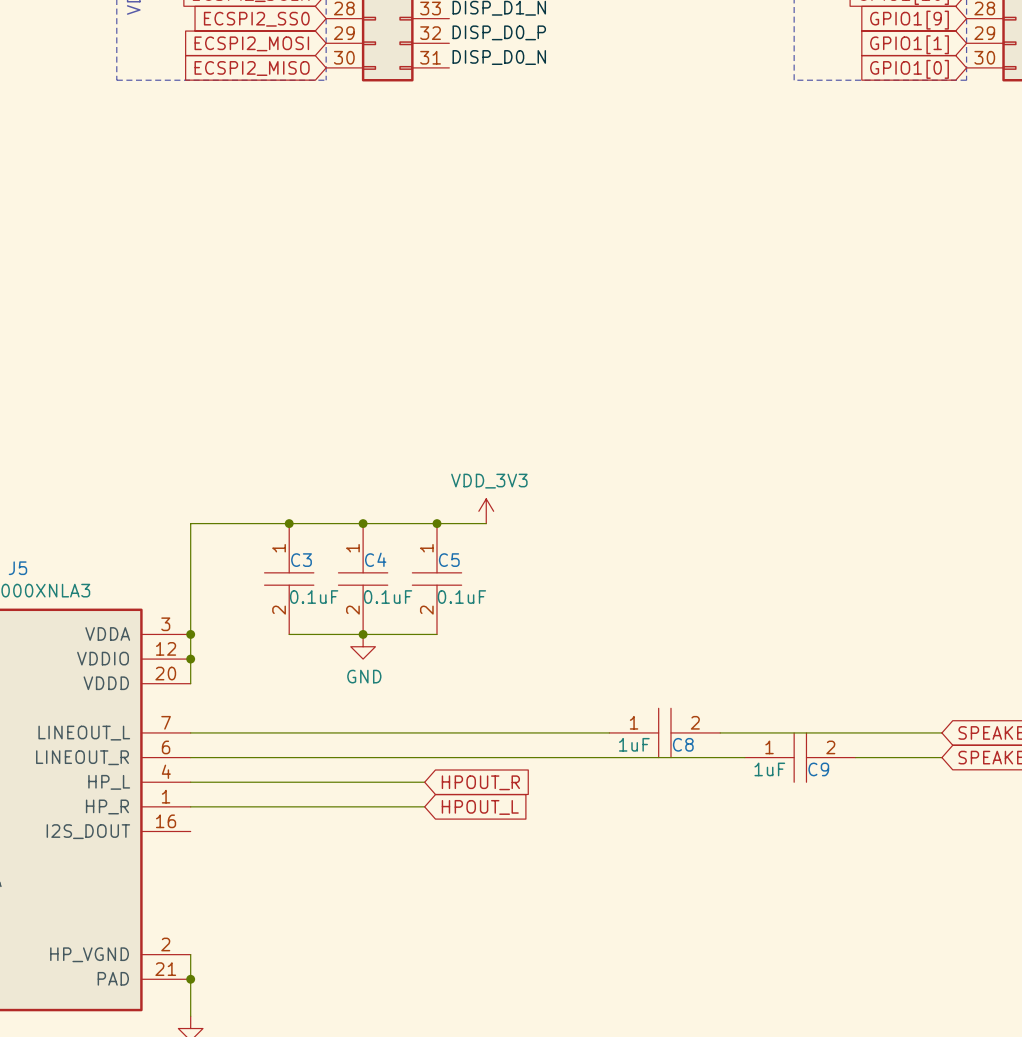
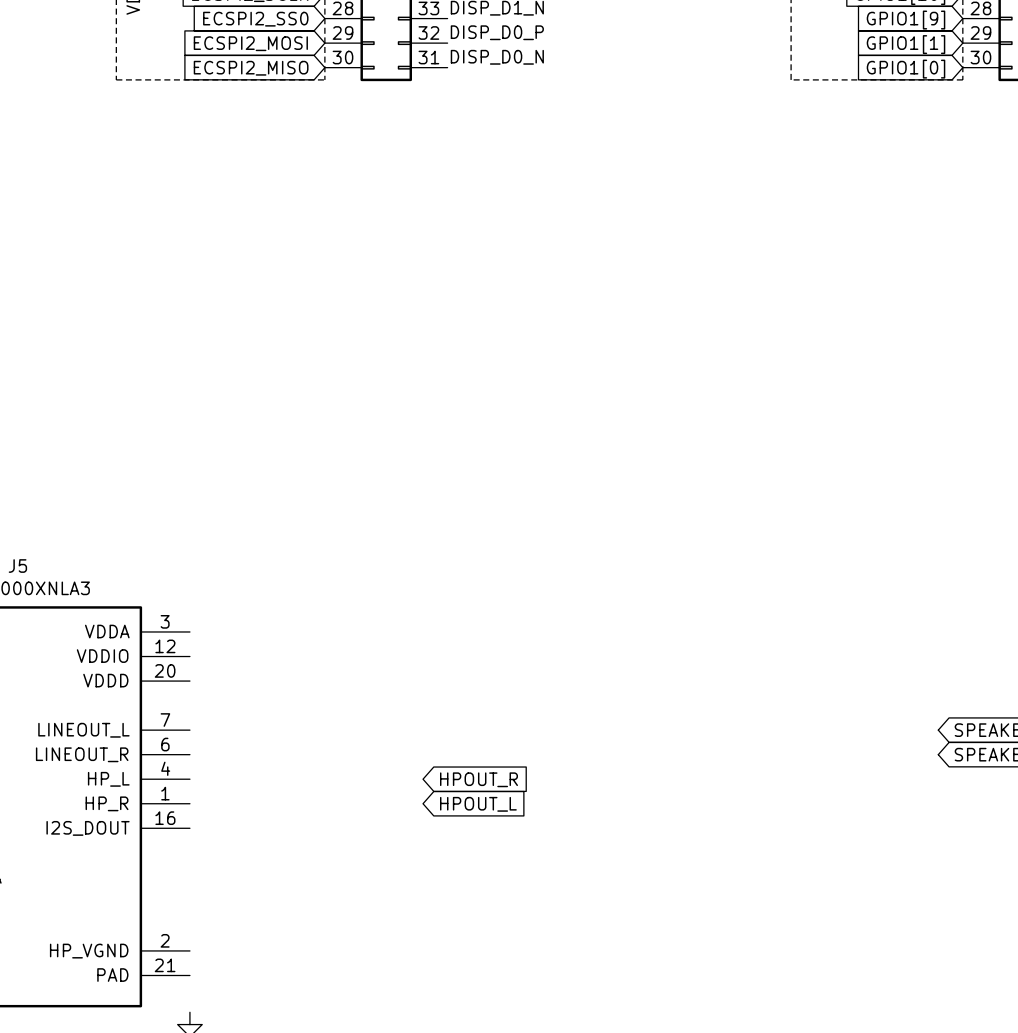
power symbol: VDD_3V3 (486, 511) -> none
junction: (289, 523) -> none
junction: (363, 523) -> none
junction: (436, 523) -> none
wire: (486, 523) (190, 523) (190, 683) -> none
C3: (289, 579) -> none
C4: (363, 579) -> none
C5: (436, 579) -> none
junction: (190, 634) -> none
wire: (289, 634) (436, 634) -> none
junction: (363, 634) -> none
power symbol: GND (363, 646) -> none
junction: (190, 659) -> none
wire: (190, 732) (609, 732) -> none
C8: (664, 732) -> none
wire: (720, 732) (941, 732) -> none
wire: (190, 757) (744, 757) -> none
C9: (800, 757) -> none
wire: (855, 757) (941, 757) -> none
wire: (190, 782) (424, 782) -> none
wire: (190, 806) (424, 806) -> none
wire: (190, 954) (190, 1016) -> none
junction: (190, 979) -> none

